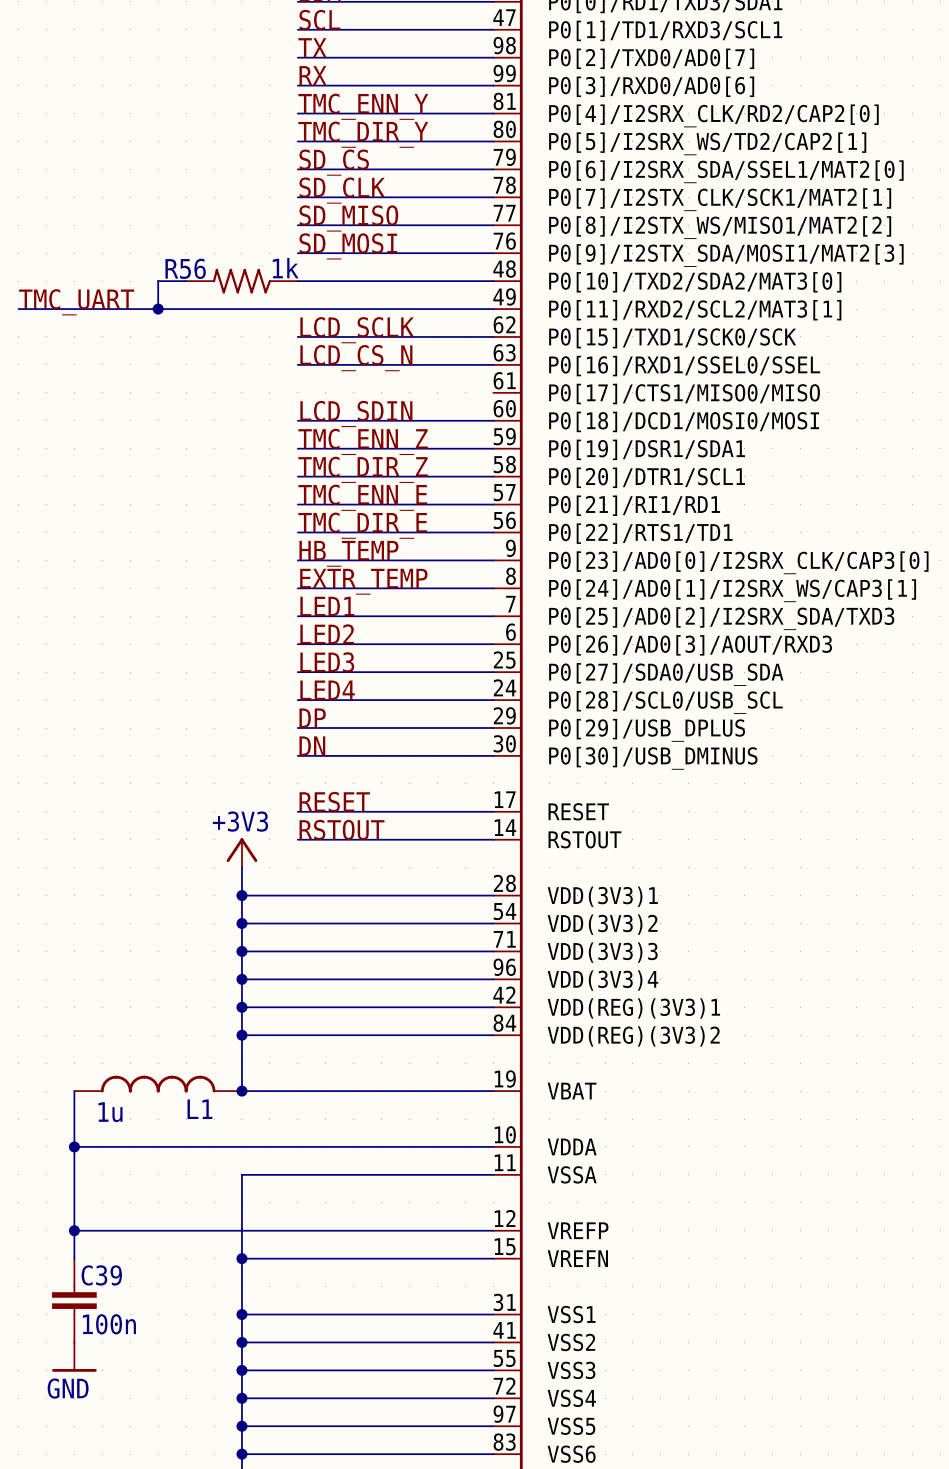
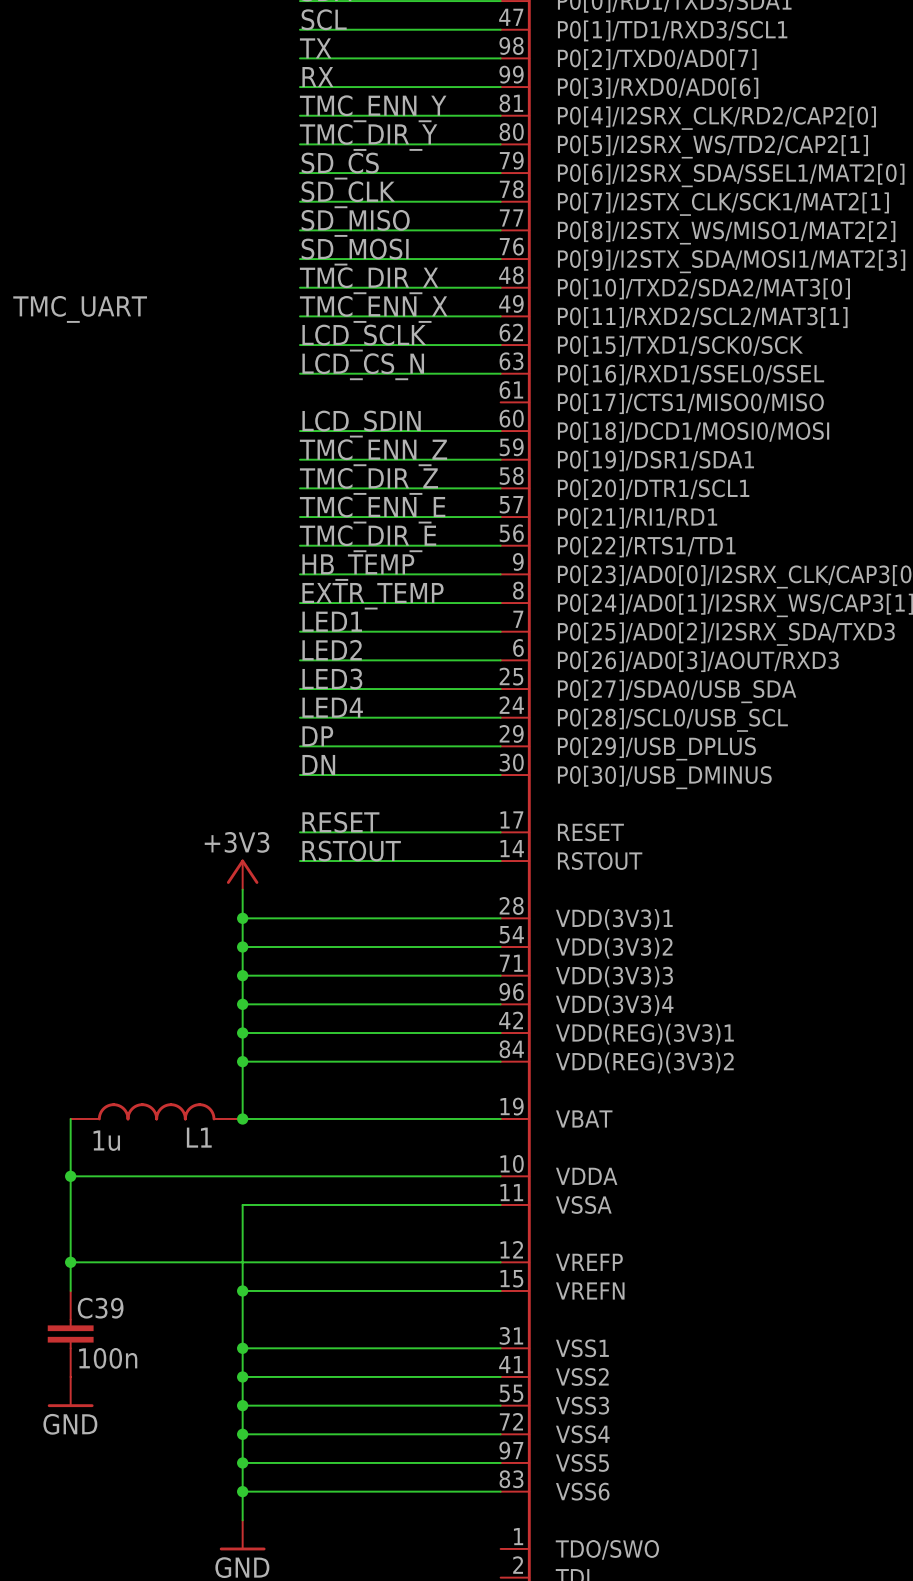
label: none -> TMC_DIR_X (369, 280)
wire: (186, 281) (158, 281) (158, 309) -> none
R56: (241, 281) -> none
label: none -> TMC_ENN_X (373, 309)
wire: (18, 309) (297, 309) -> none
junction: (158, 309) -> none

